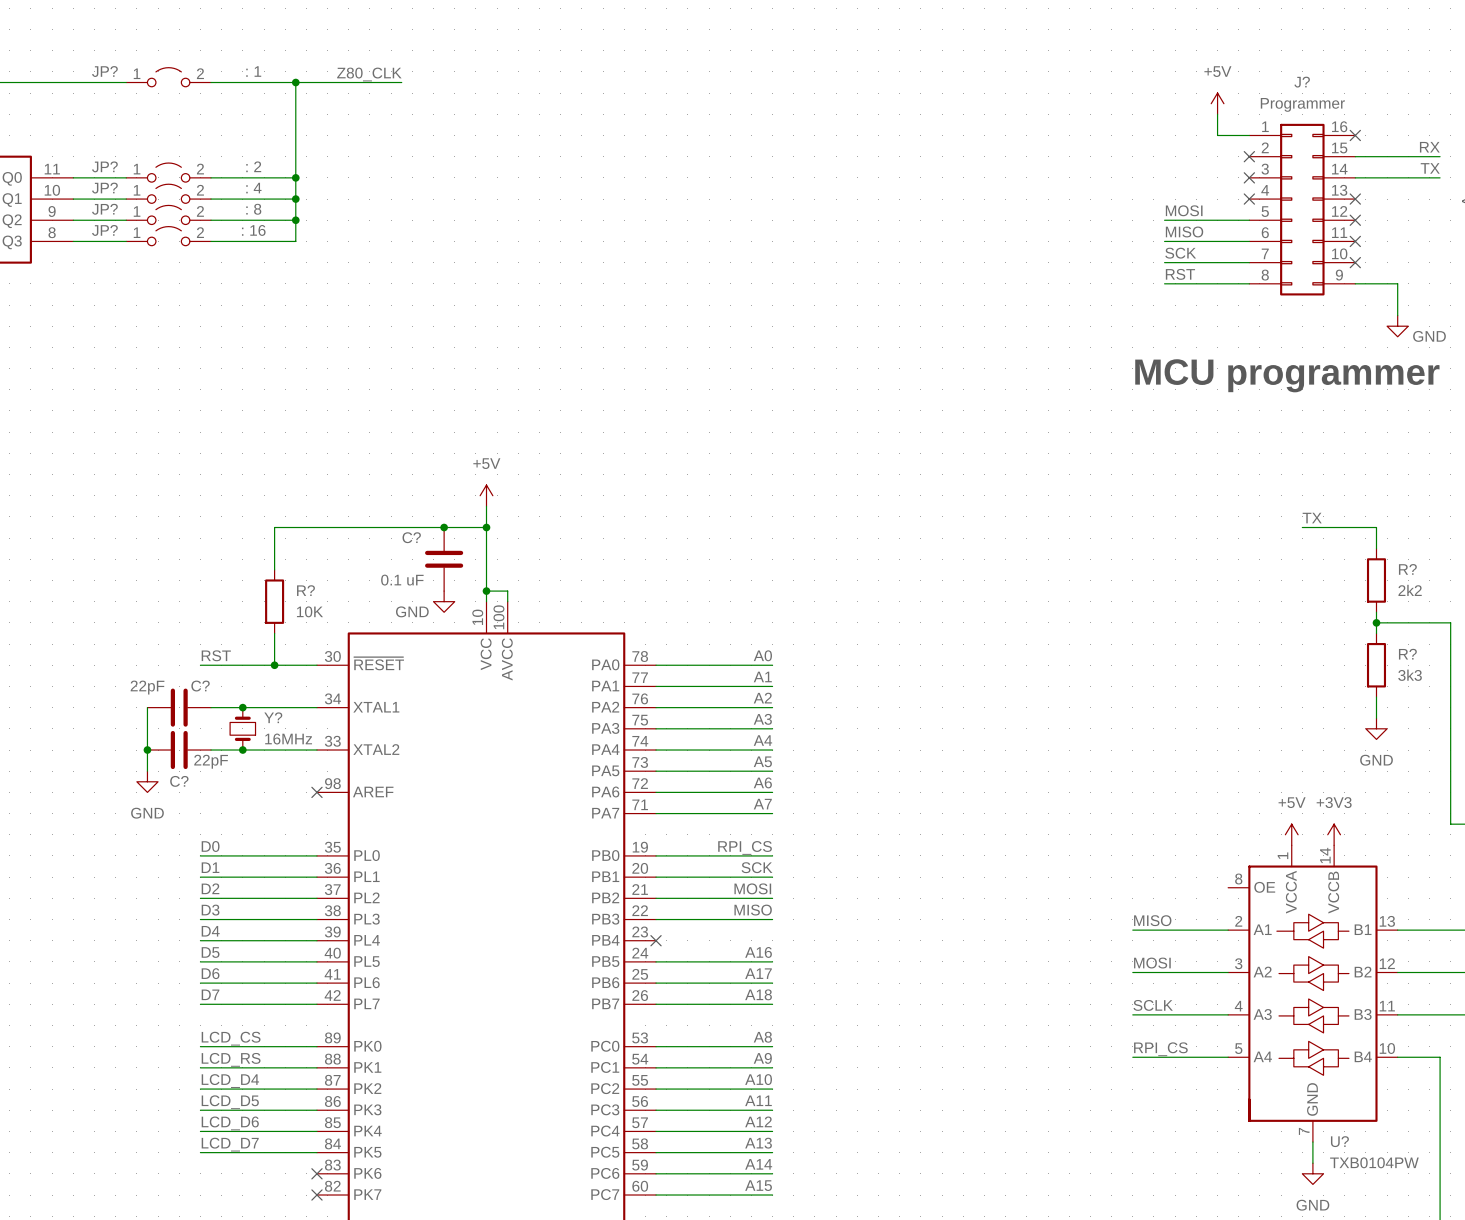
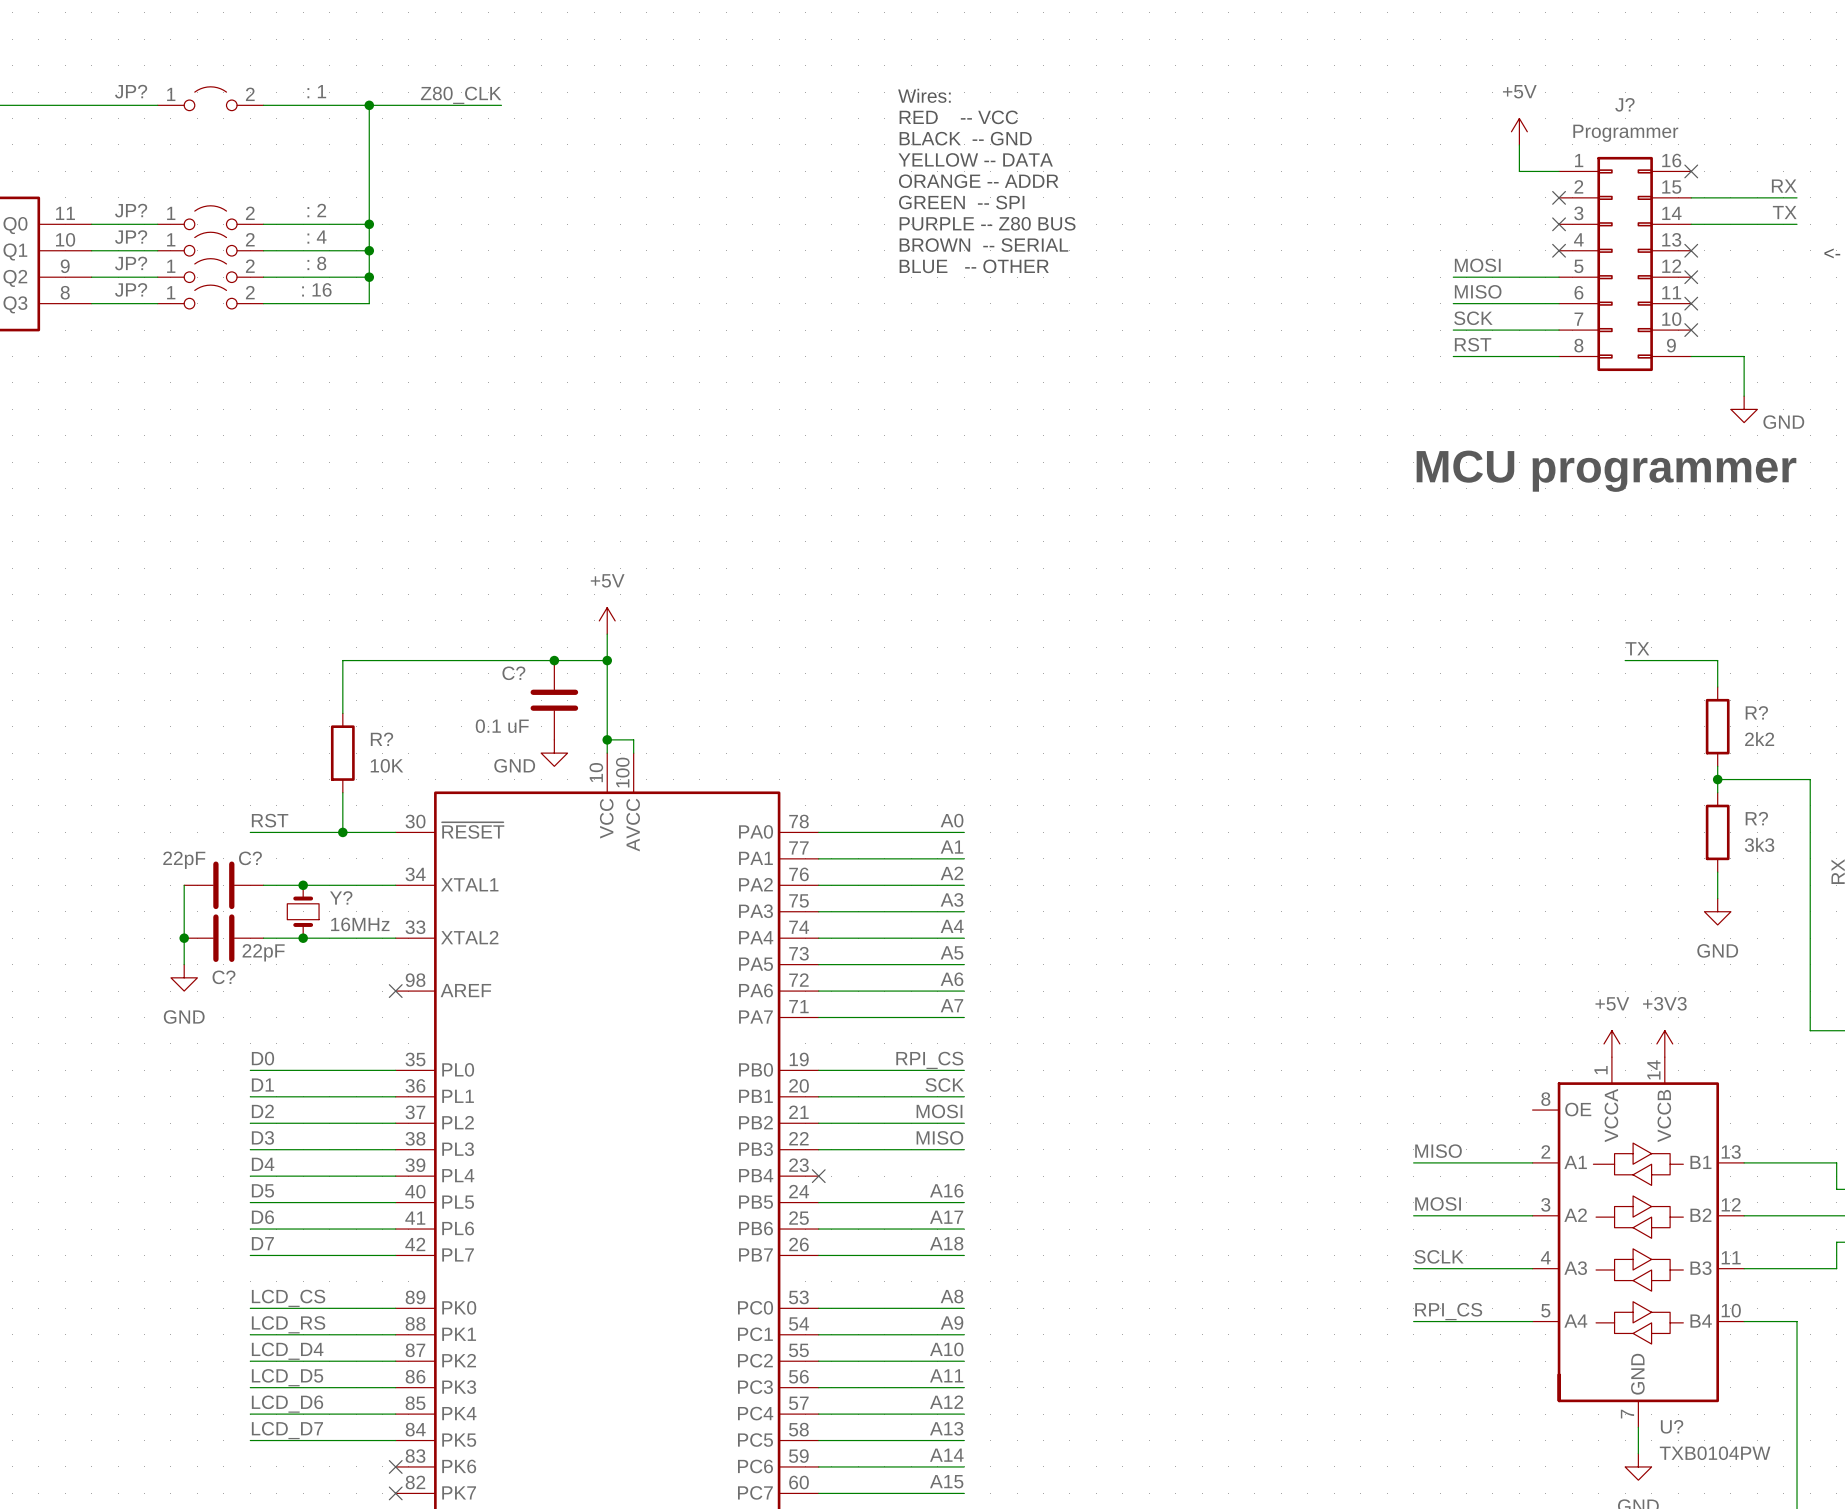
text: none -> Wires: (924, 95)
text: none -> RED -- VCC (958, 117)
text: none -> BLACK -- GND (965, 138)
text: none -> YELLOW -- DATA (975, 159)
text: none -> ORANGE -- ADDR (978, 181)
text: none -> GREEN -- SPI (961, 202)
text: none -> PURPLE -- Z80 BUS (987, 223)
text: none -> BROWN -- SERIAL (983, 245)
text: none -> BLUE -- OTHER (974, 266)

